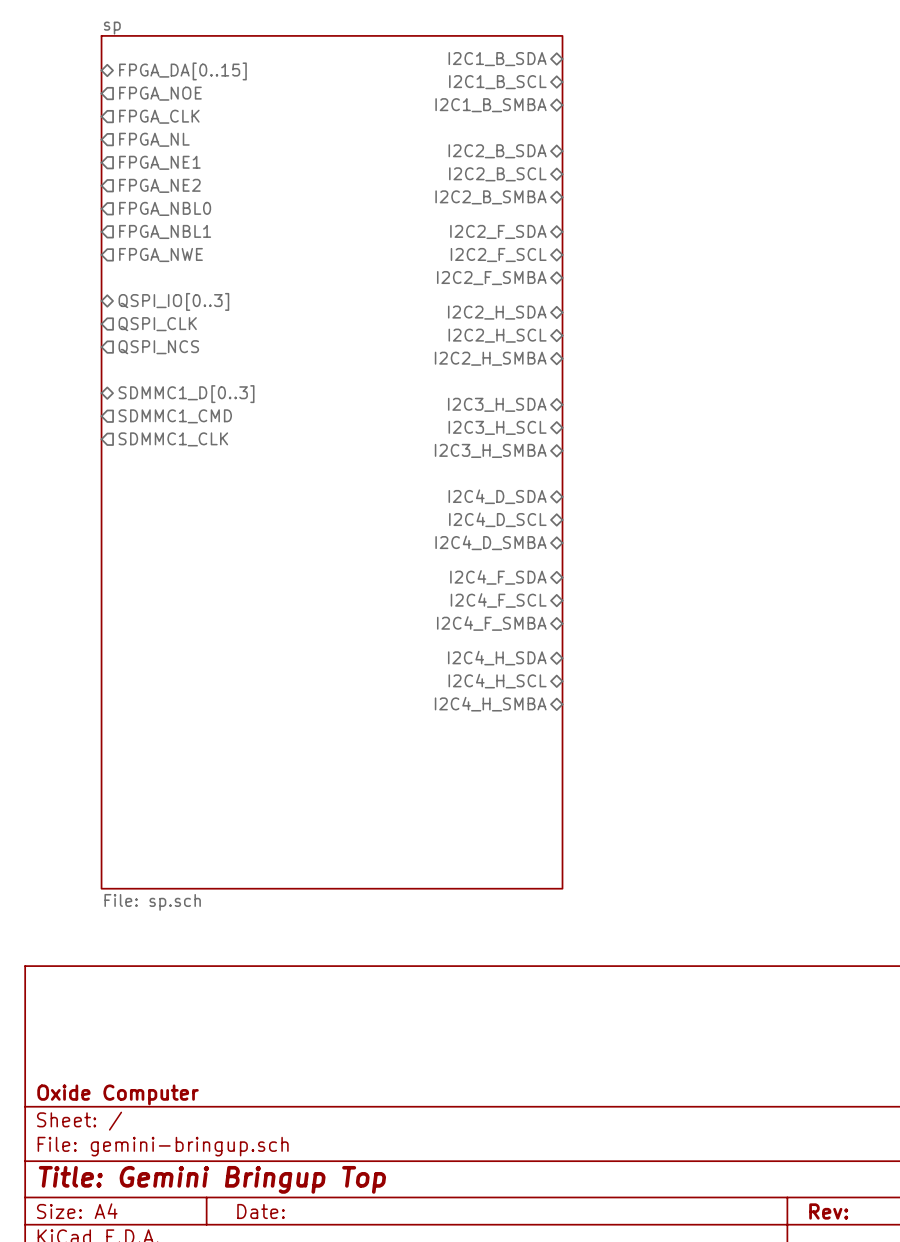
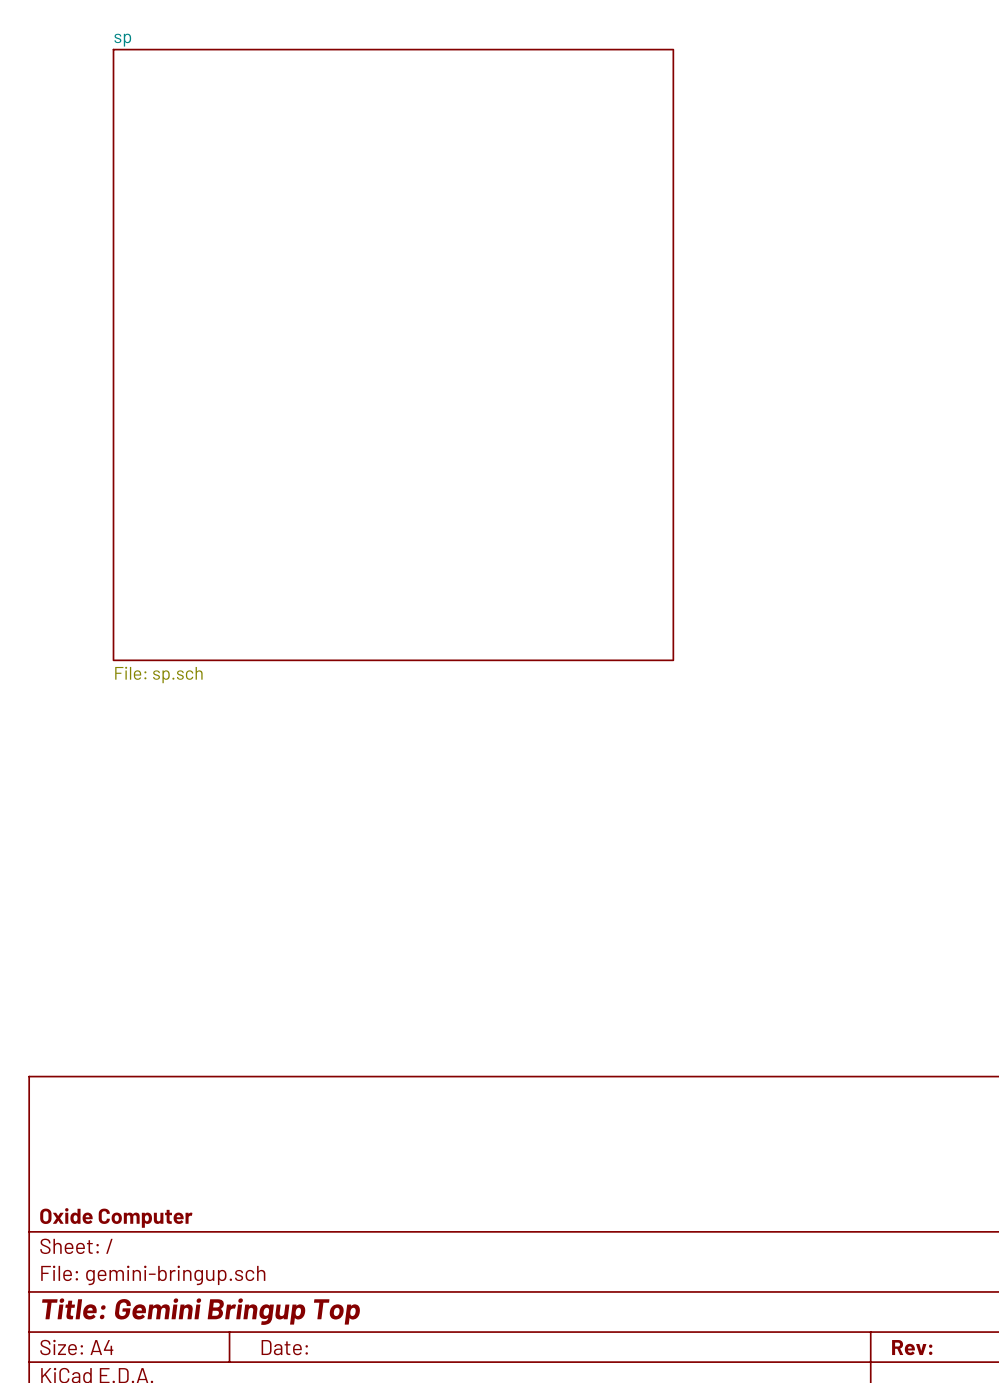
sheet pin: I2C1_B_SDA (497, 59) -> none
sheet pin: FPGA_DA[0..15] (182, 71) -> none
sheet pin: I2C1_B_SCL (497, 82) -> none
sheet pin: FPGA_NOE (160, 93) -> none
sheet pin: I2C1_B_SMBA (490, 105) -> none
sheet pin: FPGA_CLK (159, 116) -> none
sheet pin: FPGA_NL (154, 139) -> none
sheet pin: I2C2_B_SDA (497, 151) -> none
sheet pin: FPGA_NE1 (159, 162) -> none
sheet pin: I2C2_B_SCL (497, 174) -> none
sheet pin: FPGA_NE2 (159, 185) -> none
sheet pin: I2C2_B_SMBA (490, 197) -> none
sheet pin: FPGA_NBL0 (165, 208) -> none
sheet pin: FPGA_NBL1 (165, 231) -> none
sheet pin: I2C2_F_SDA (498, 231) -> none
sheet pin: FPGA_NWE (160, 255) -> none
sheet pin: I2C2_F_SCL (498, 255) -> none
sheet pin: I2C2_F_SMBA (491, 278) -> none
sheet pin: QSPI_IO[0..3] (173, 301) -> none
sheet sp: none -> File: sp.sch (393, 354)
sheet pin: I2C2_H_SDA (497, 312) -> none
sheet pin: QSPI_CLK (157, 324) -> none
sheet pin: I2C2_H_SCL (497, 335) -> none
sheet pin: QSPI_NCS (158, 347) -> none
sheet pin: I2C2_H_SMBA (490, 358) -> none
sheet pin: SDMMC1_D[0..3] (186, 394) -> none
sheet pin: I2C3_H_SDA (497, 404) -> none
sheet pin: SDMMC1_CMD (175, 416) -> none
sheet pin: I2C3_H_SCL (497, 427) -> none
sheet pin: SDMMC1_CLK (173, 439) -> none
sheet pin: I2C3_H_SMBA (490, 450) -> none
sheet sp: File: sp.sch (332, 462) -> none
sheet pin: I2C4_D_SDA (497, 496) -> none
sheet pin: I2C4_D_SCL (497, 519) -> none
sheet pin: I2C4_D_SMBA (490, 542) -> none
sheet pin: I2C4_F_SDA (498, 577) -> none
sheet pin: I2C4_F_SCL (498, 600) -> none
sheet pin: I2C4_F_SMBA (491, 623) -> none
sheet pin: I2C4_H_SDA (497, 658) -> none
sheet pin: I2C4_H_SCL (497, 681) -> none
sheet pin: I2C4_H_SMBA (490, 704) -> none

